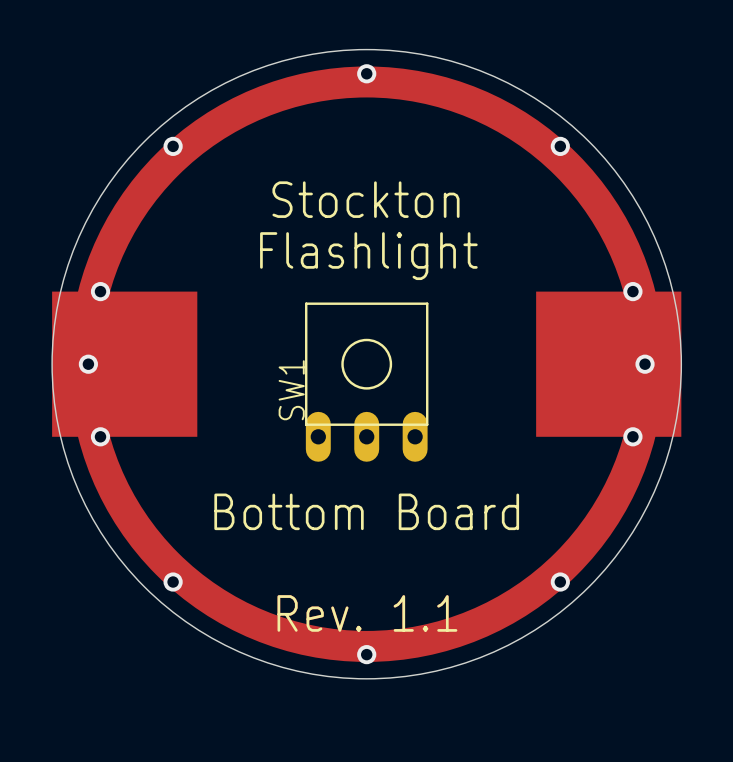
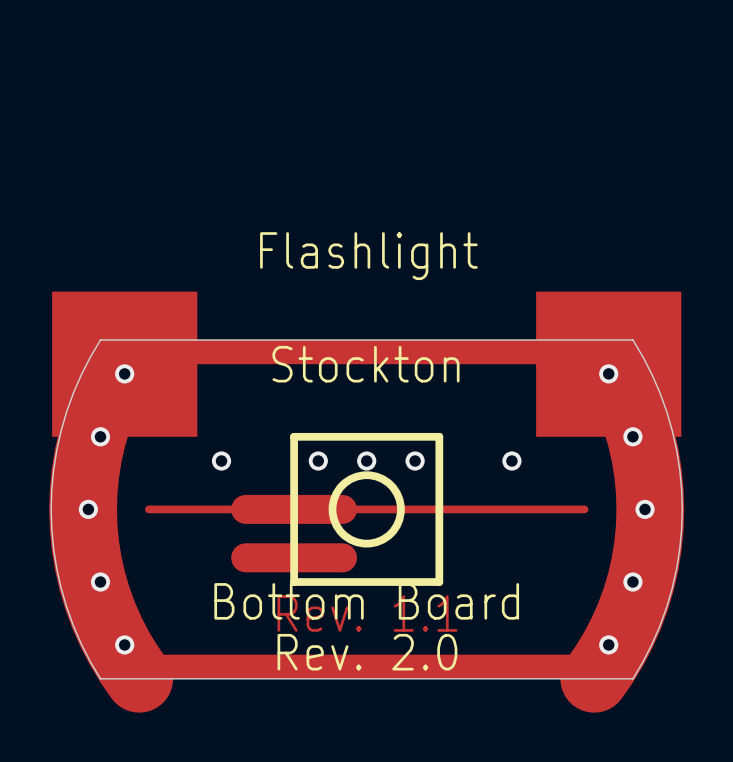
round board edge: [51, 49, 682, 680] -> none
drawing shape: [68, 66, 665, 662] -> [100, 340, 633, 365]
via: (366, 73) -> none
via: (173, 146) -> none
via: (560, 146) -> none
text position: Stockton (365, 199) -> Stockton (365, 364)
via: (100, 291) -> none
via: (632, 291) -> none
board edge: none -> (100, 340) (632, 340) (660, 393) (672, 430) (679, 469) (682, 509) (679, 549) (672, 588) (660, 625) (632, 678) (100, 678) (73, 625) (61, 588) (53, 549) (51, 509) (53, 469) (61, 430) (73, 393) (100, 340)
track: none -> (139, 340) (119, 370) (97, 420) (85, 473) (83, 509) (85, 545) (97, 598) (119, 648) (139, 678)
track: none -> (594, 340) (613, 370) (635, 420) (648, 473) (650, 509) (648, 545) (635, 598) (622, 632) (594, 678)
via position: (88, 364) -> (124, 373)
via position: (645, 364) -> (608, 373)
SW1: (366, 382) -> none
line: none -> (294, 436) (439, 436) (439, 582) (294, 582) (294, 436)
via: none -> (221, 461)
via: none -> (318, 461)
via: none -> (366, 461)
via: none -> (415, 461)
via: none -> (511, 461)
drawing: none -> [328, 471, 405, 548]
via: none -> (88, 509)
track: none -> (148, 509) (584, 509)
via: none -> (645, 509)
text position: Bottom Board (366, 511) -> Bottom Board (366, 601)
track: none -> (245, 557) (342, 557)
via: none -> (100, 582)
via: (173, 582) -> none
via: (560, 582) -> none
via: none -> (632, 582)
text: Rev. 1.1 (367, 613) -> Rev. 2.0 (367, 652)
via: none -> (124, 644)
via: none -> (608, 644)
drawing: none -> [100, 654, 633, 679]
via: (366, 654) -> none

